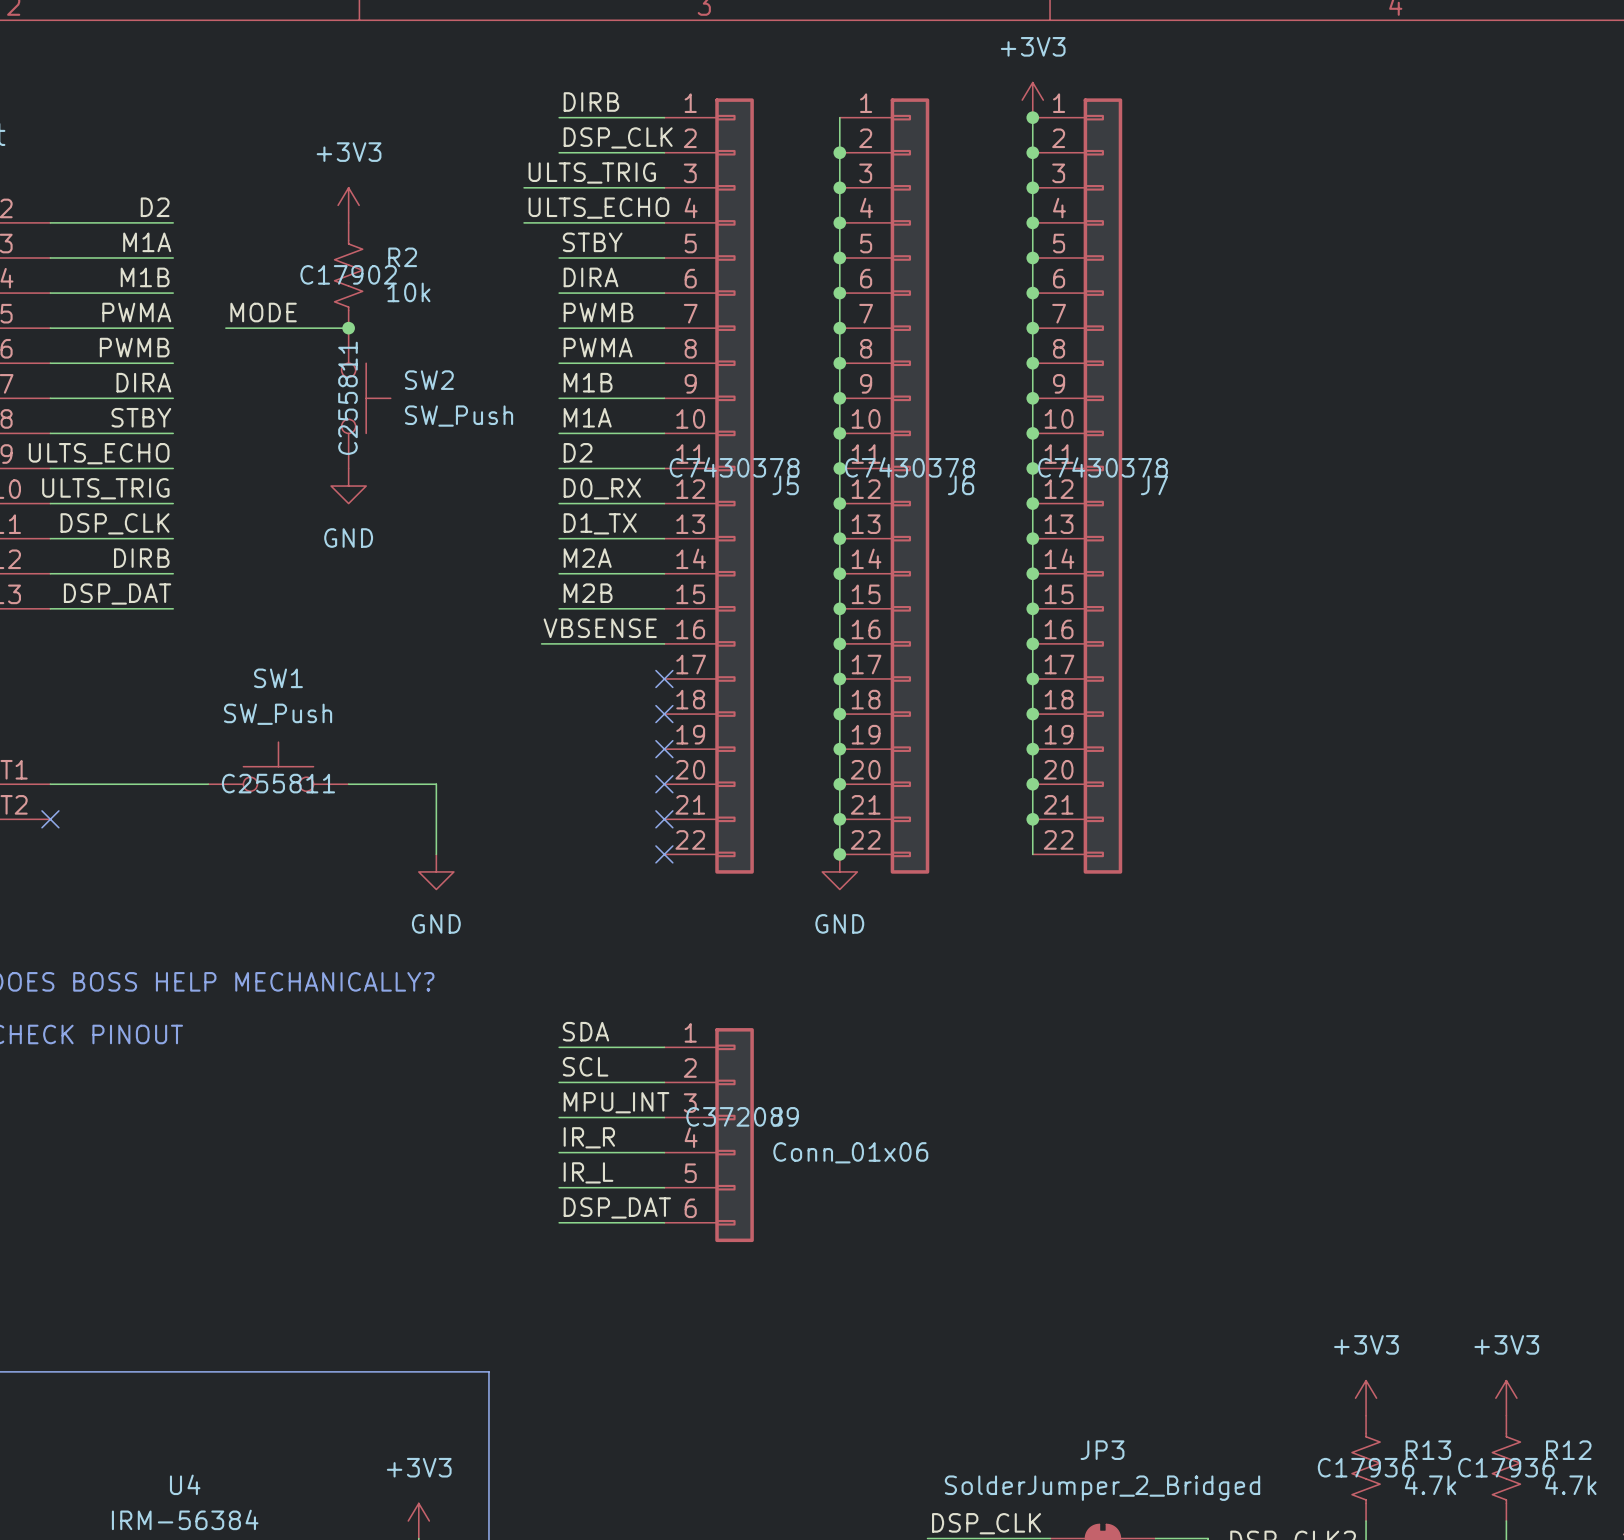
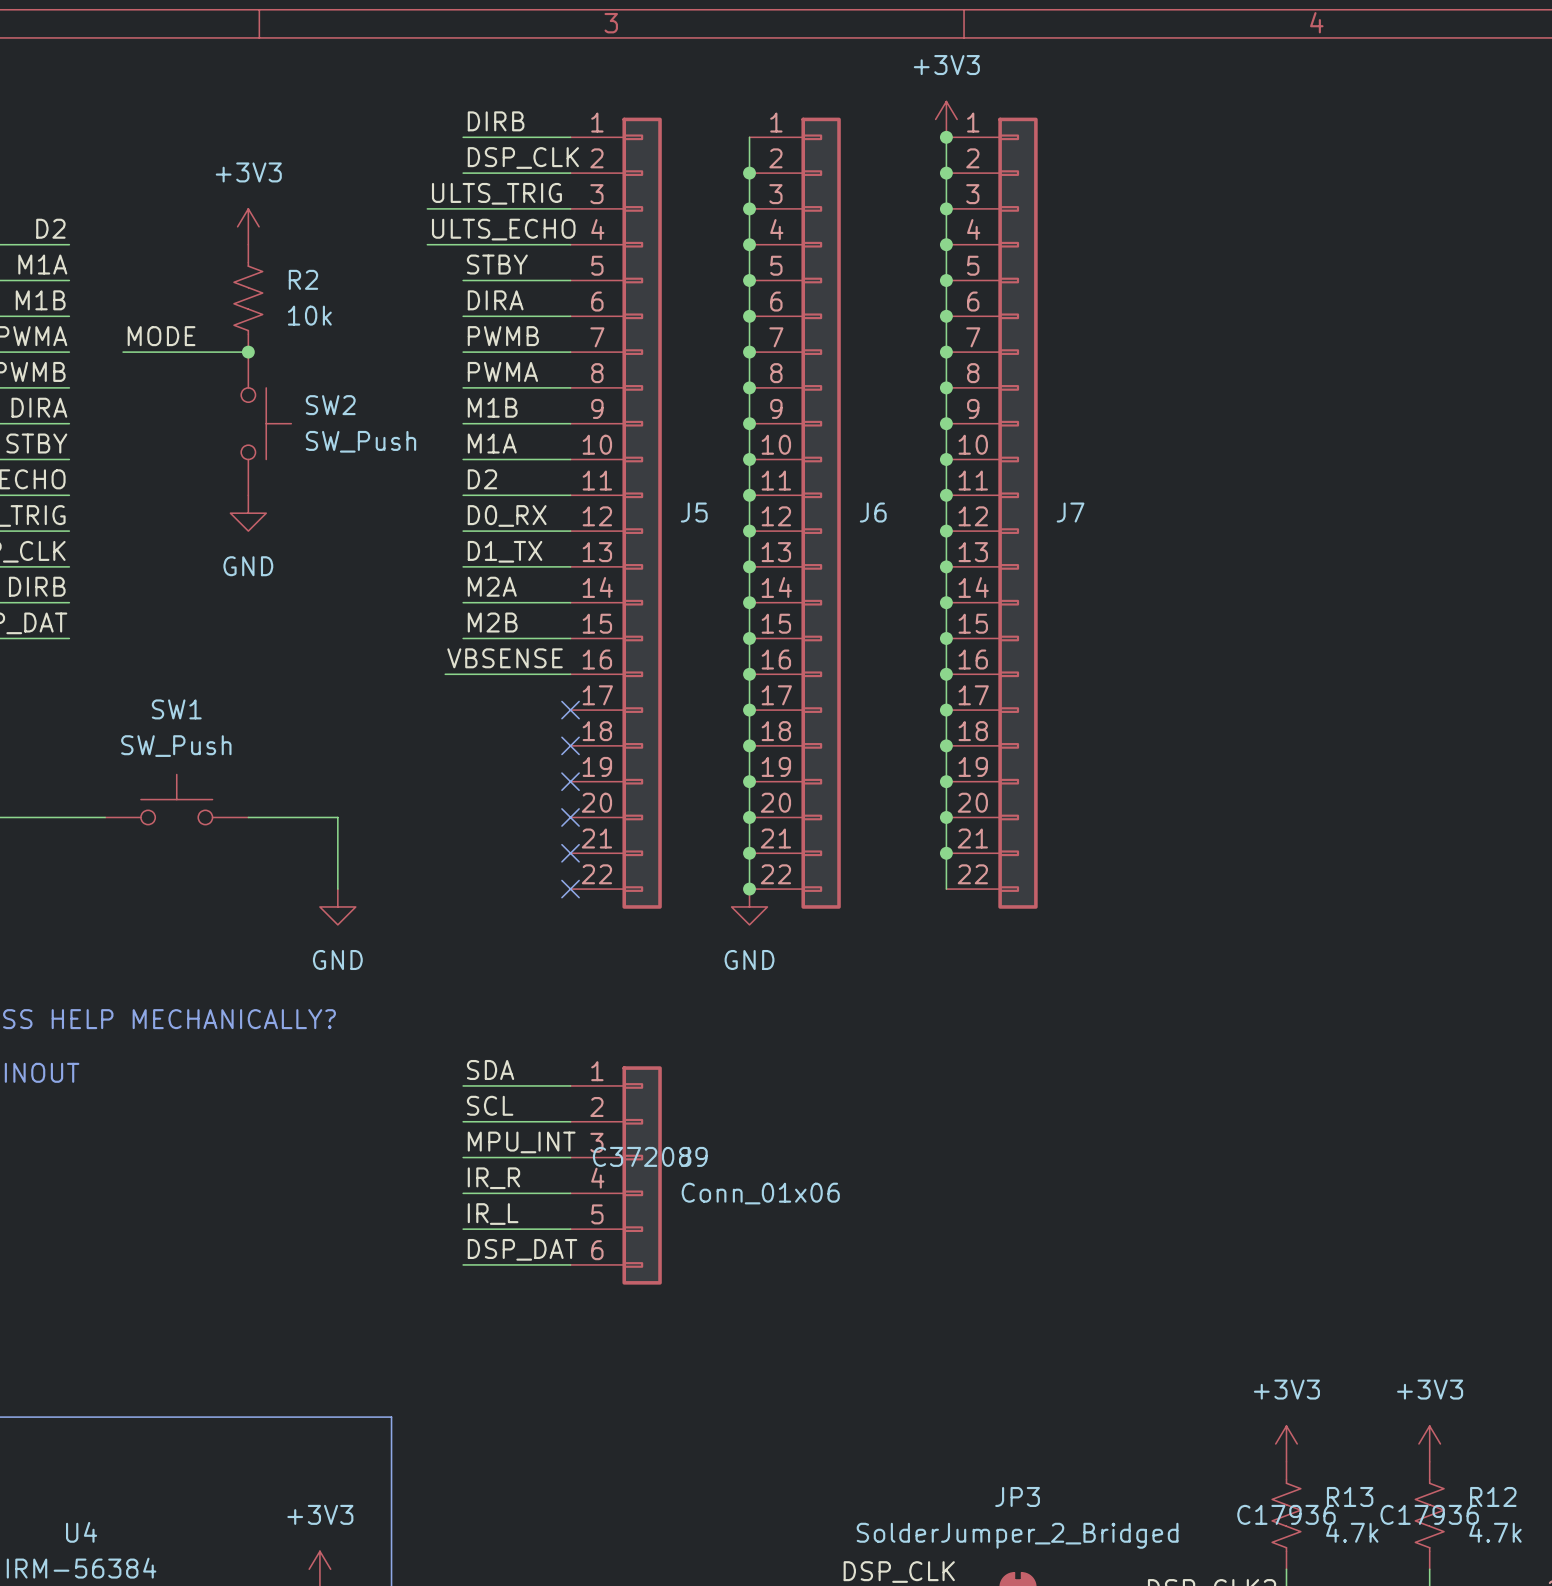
R2 text: C17902 (348, 274) -> none
SW2 text: C255811 (347, 398) -> none
J5 text: C7430378 (734, 467) -> none
J6 text: C7430378 (909, 467) -> none
J7 text: C7430378 (1102, 467) -> none
SW1 text: C255811 (278, 783) -> none

